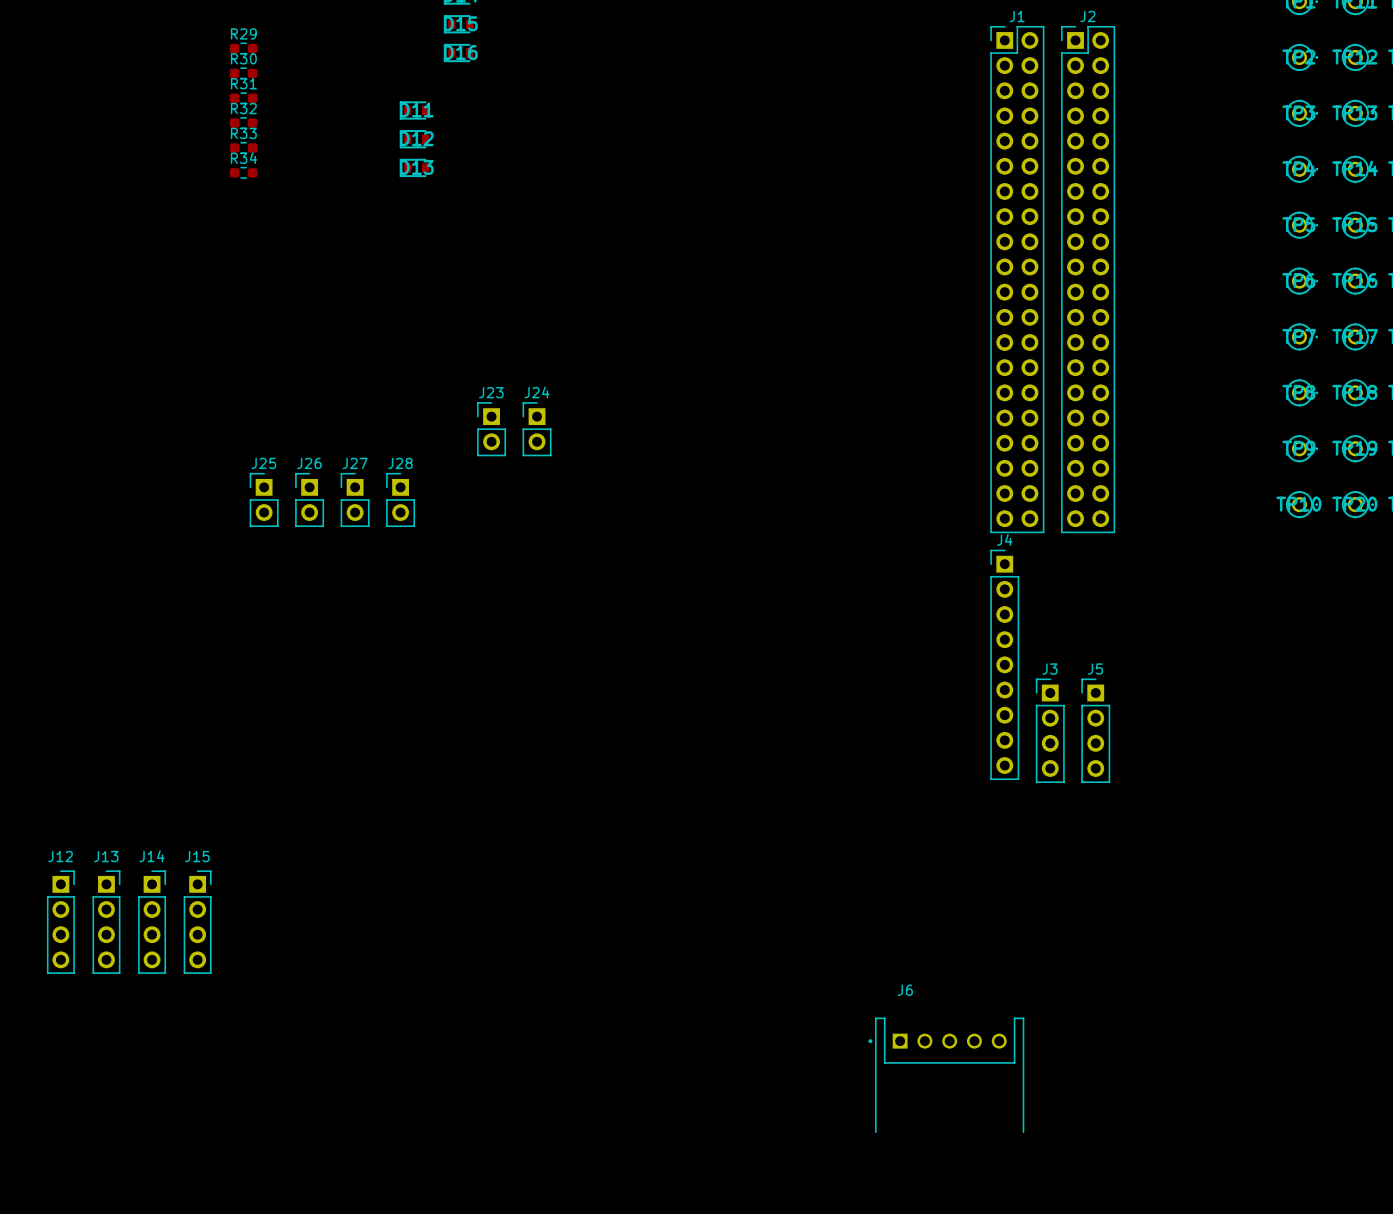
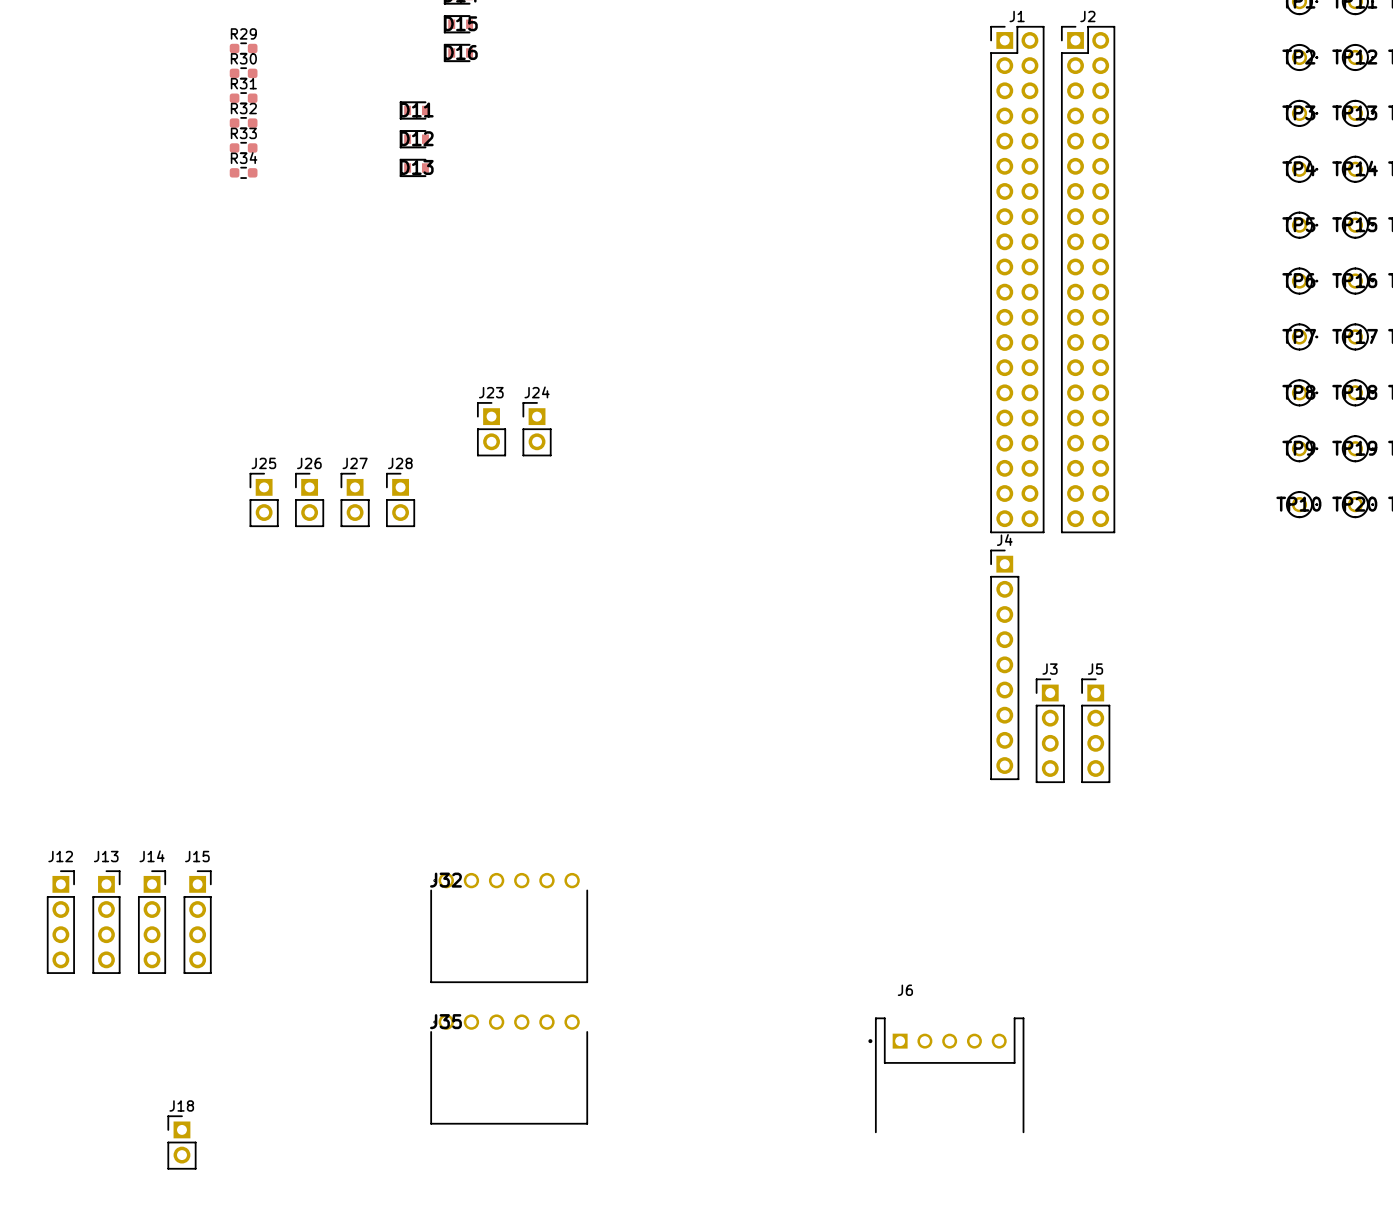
J32: none -> (509, 927)
J35: none -> (509, 1069)
J18: none -> (181, 1142)

